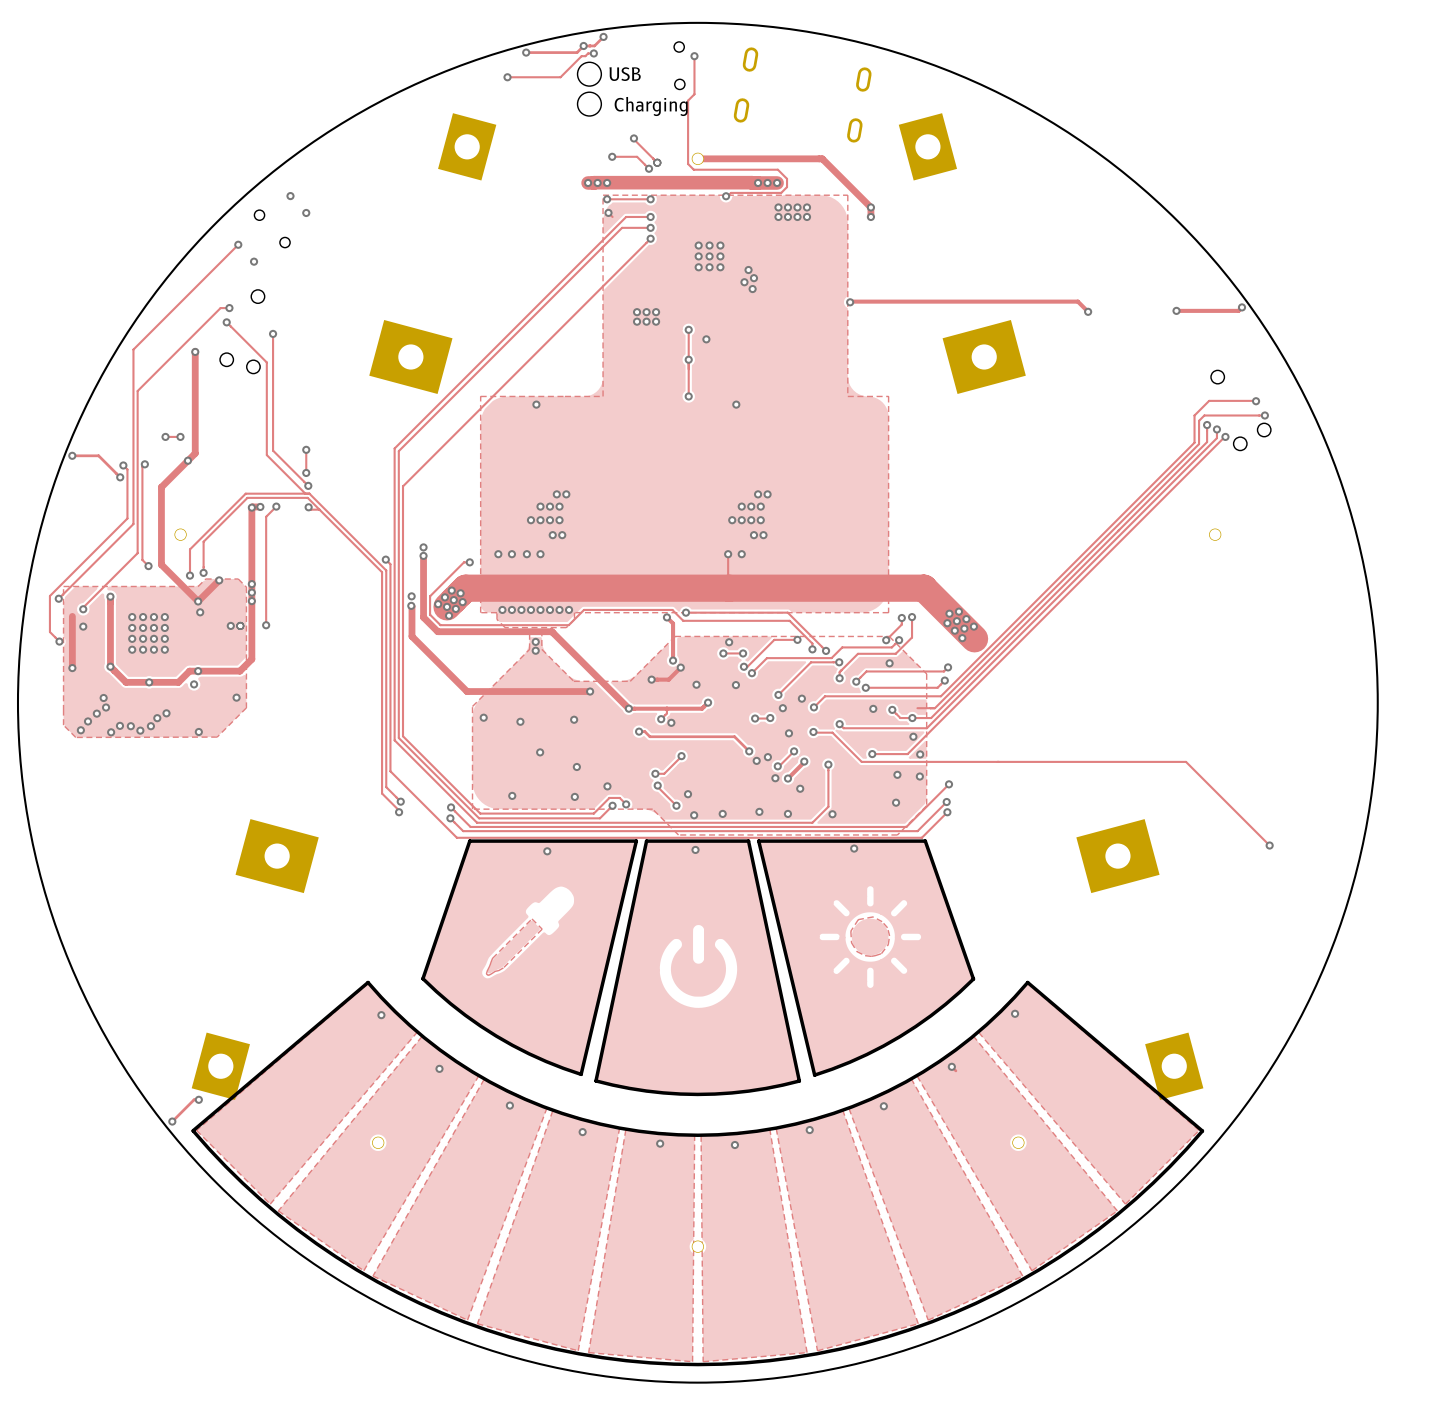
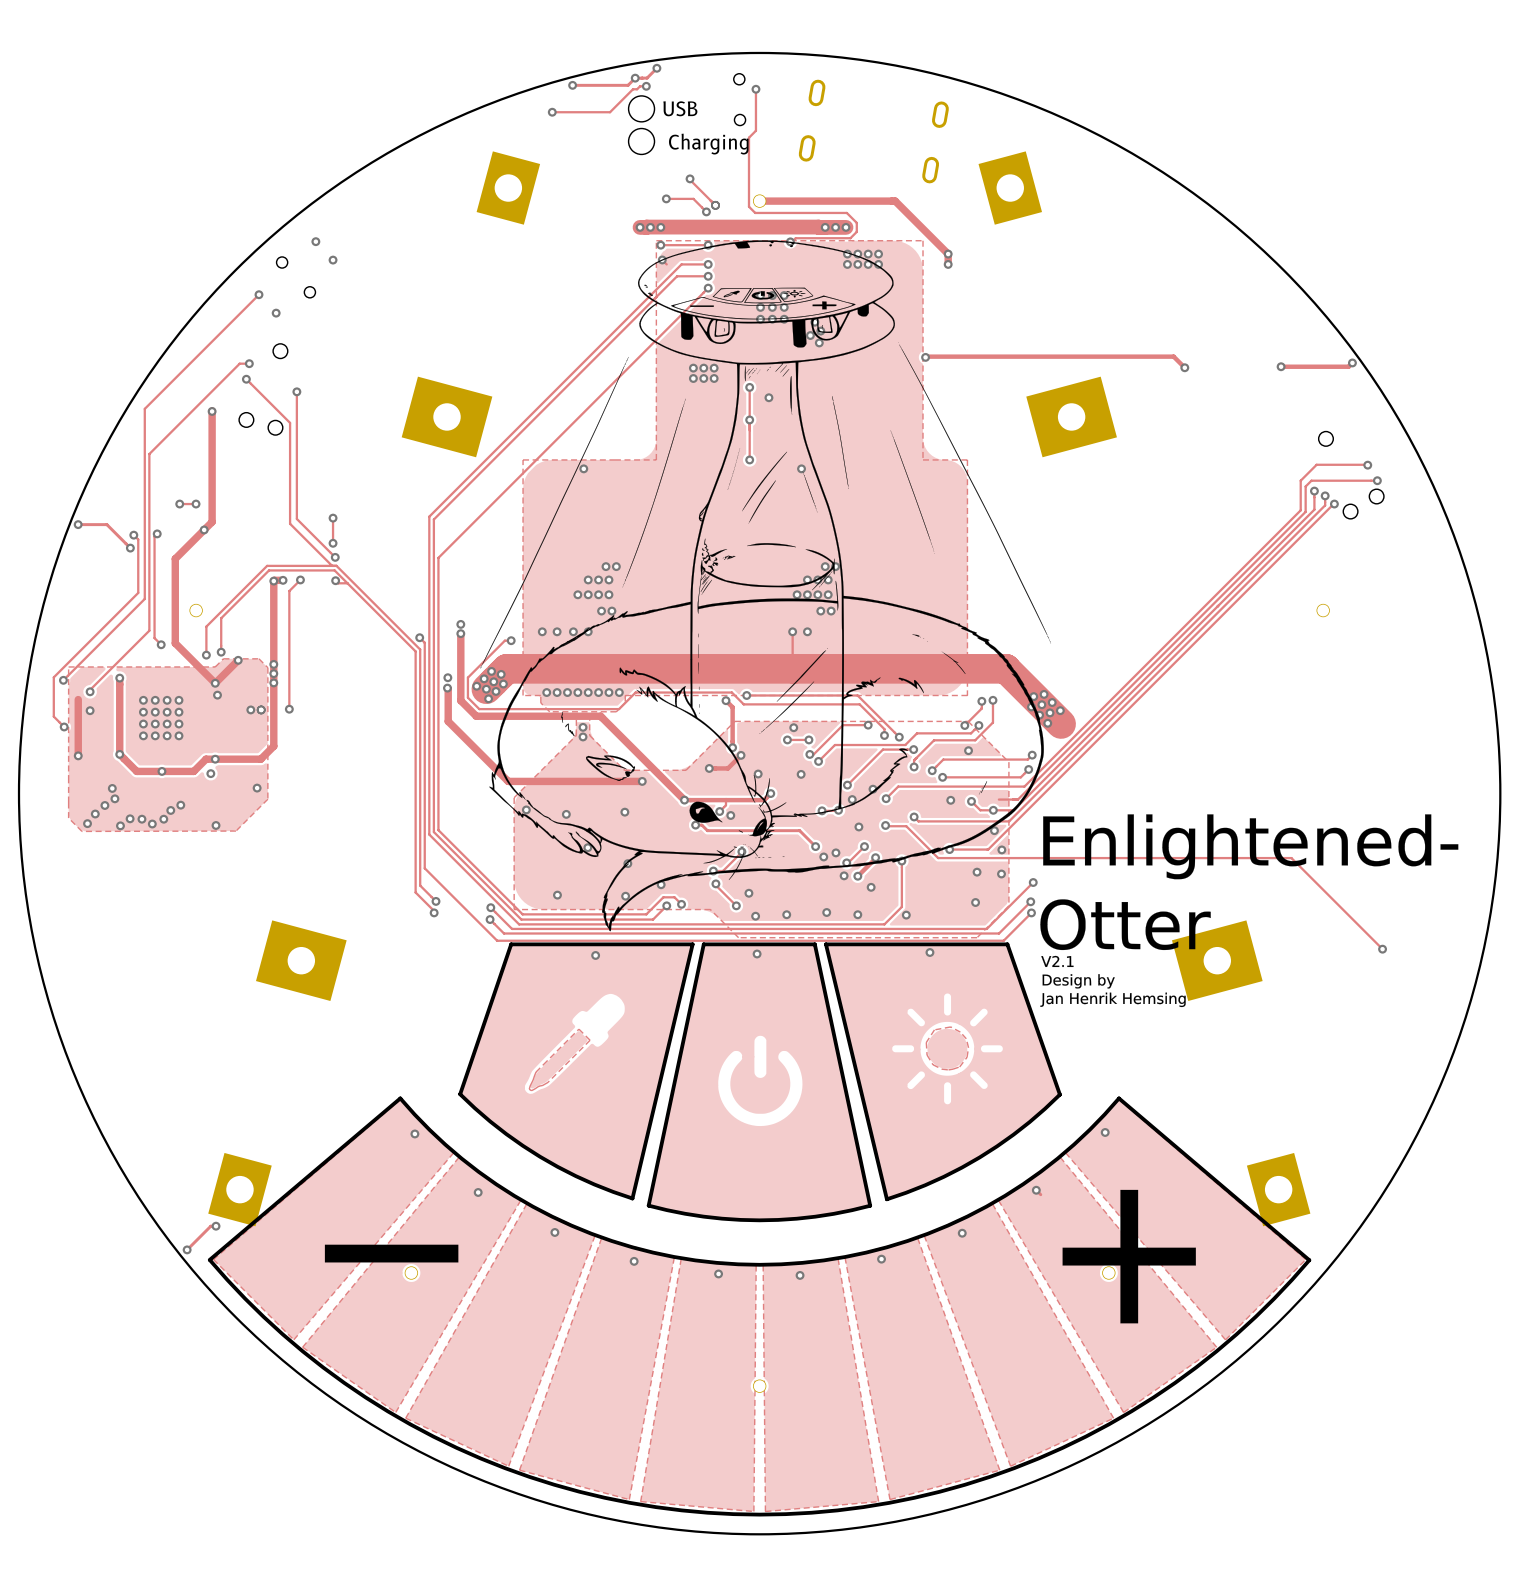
drawing: none -> [480, 240, 1459, 1008]
drawing: none -> [1062, 1189, 1196, 1324]
drawing: none -> [324, 1244, 459, 1263]

